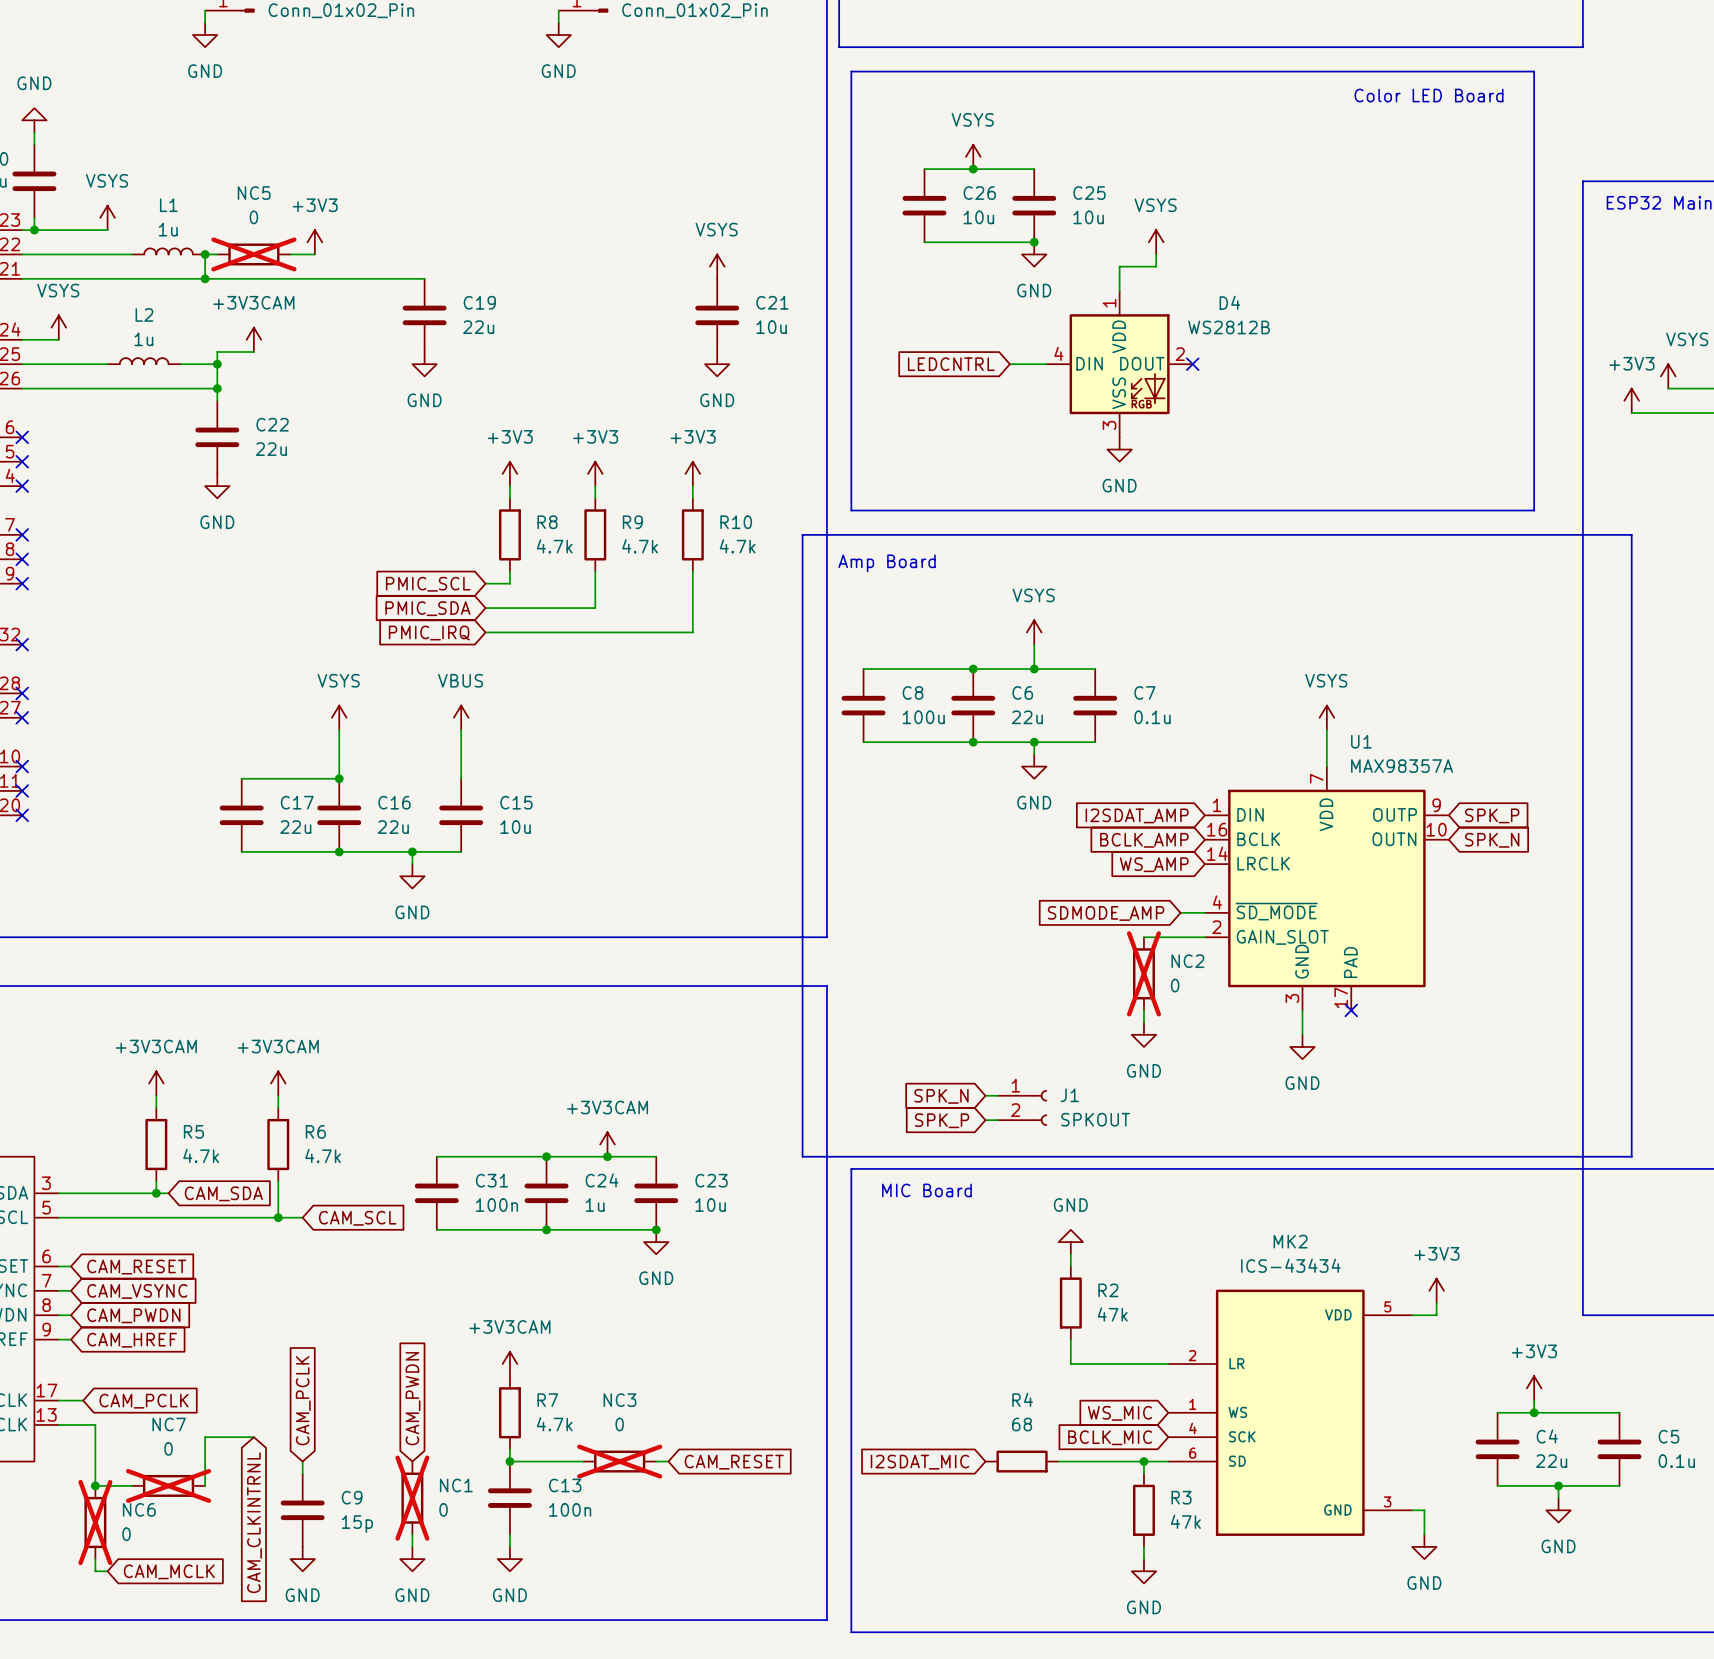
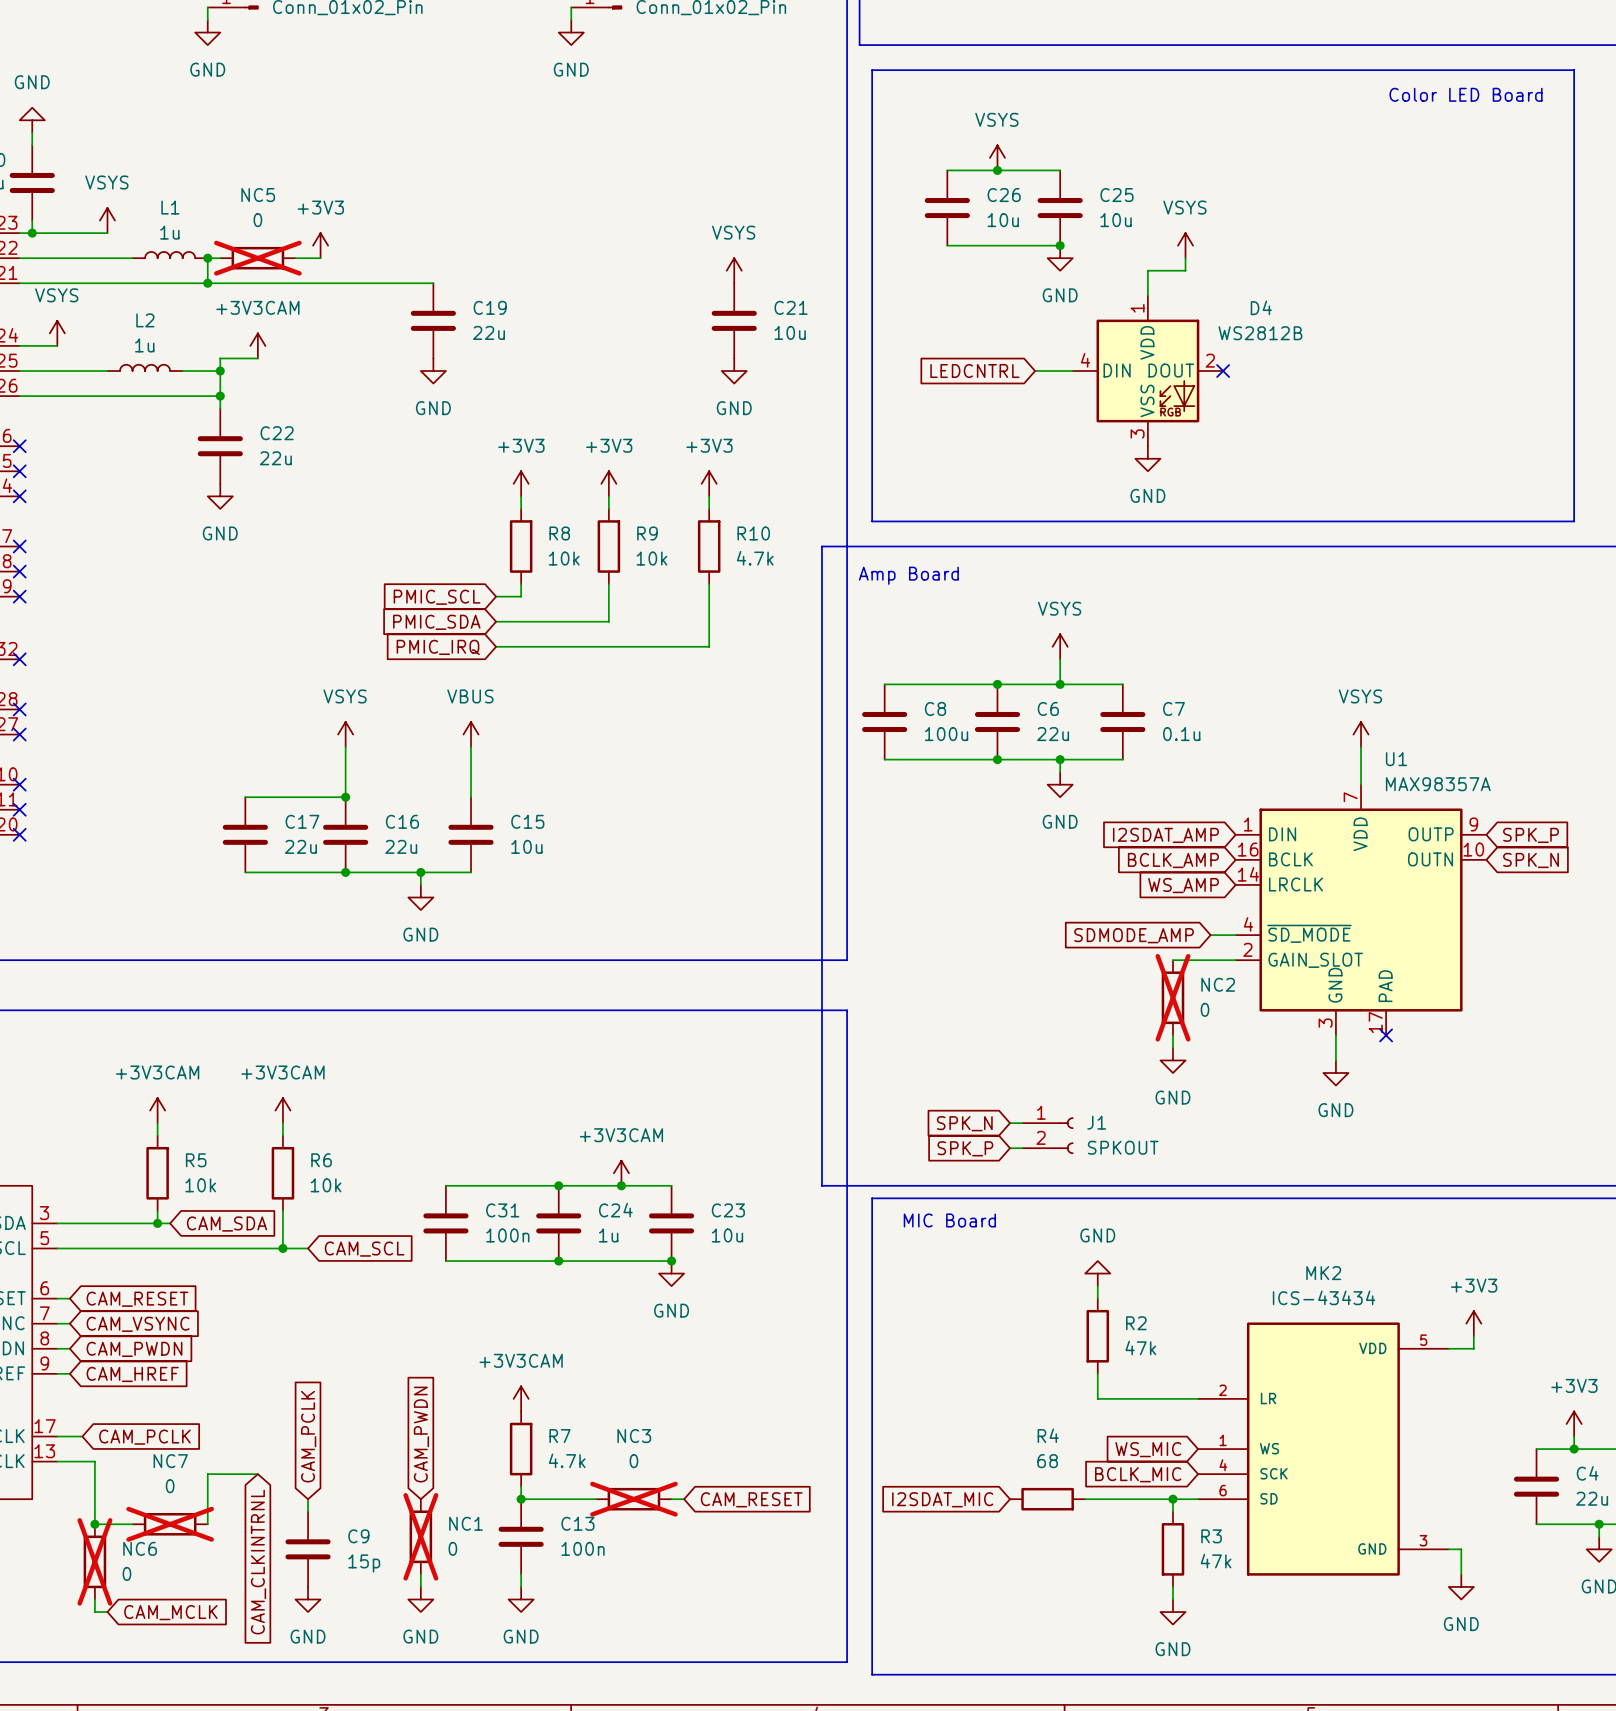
R8 value: 4.7k (554, 546) -> 10k (564, 558)
R9 value: 4.7k (640, 546) -> 10k (651, 558)
R5 value: 4.7k (201, 1155) -> 10k (200, 1185)
R6 value: 4.7k (323, 1155) -> 10k (326, 1185)

